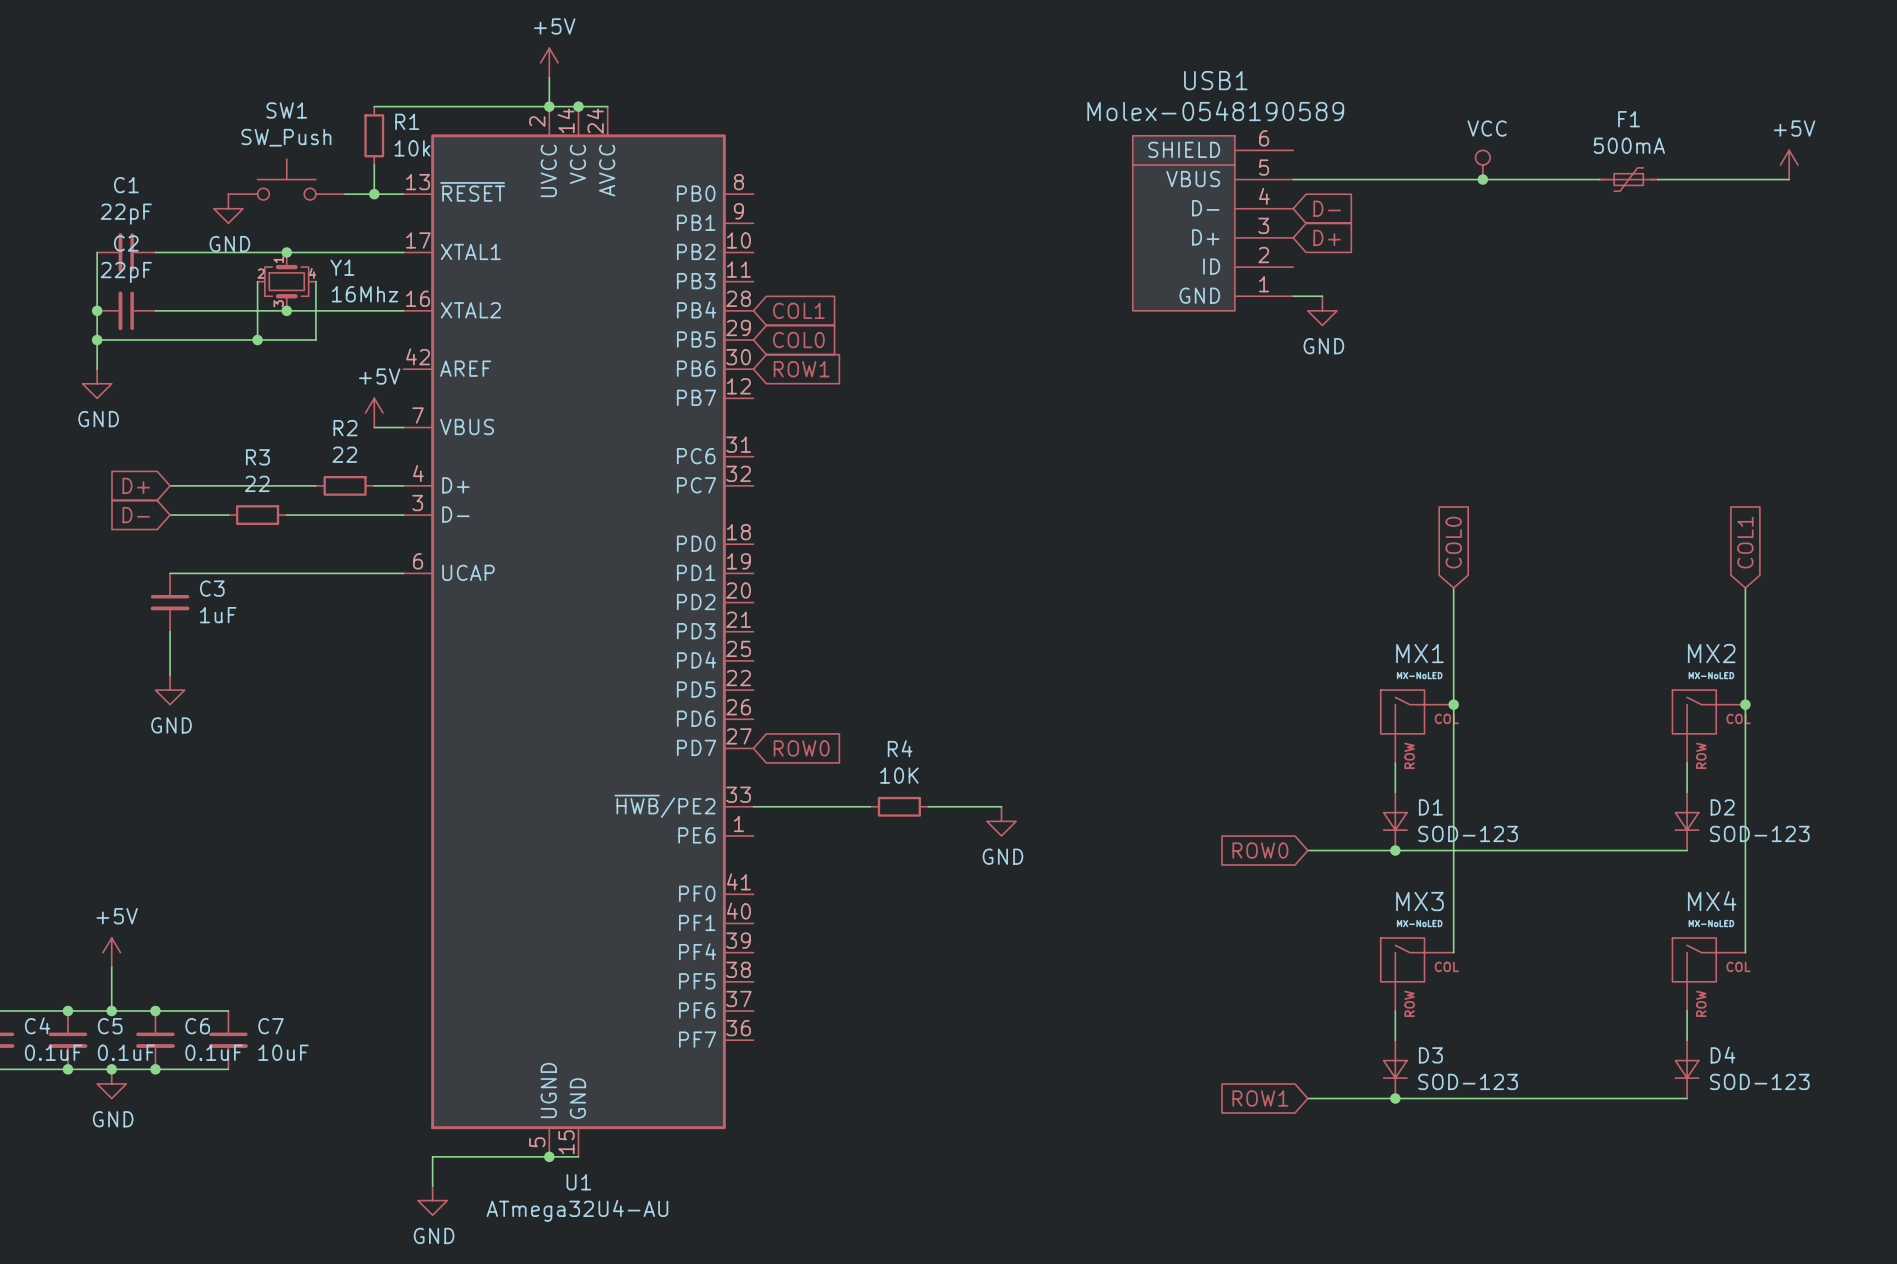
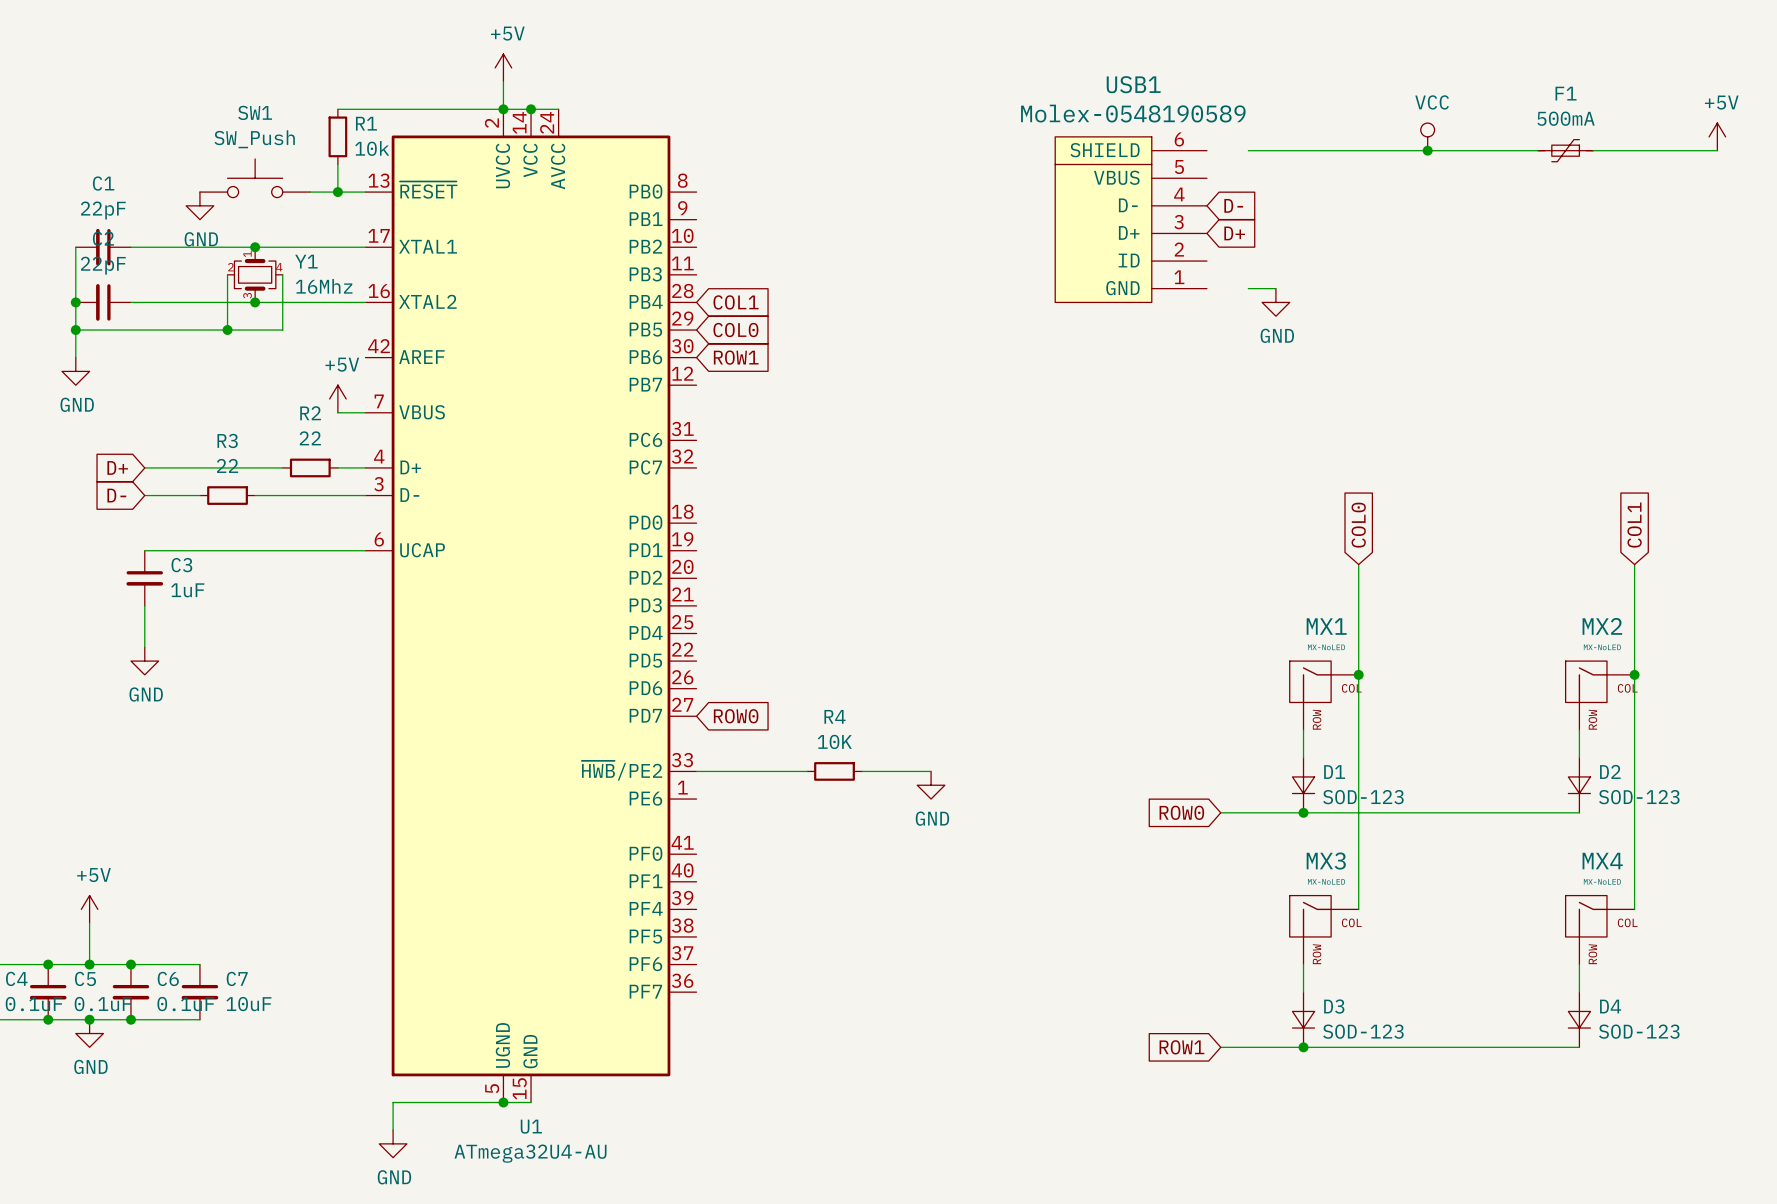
power symbol position: VCC (1482, 164) -> VCC (1427, 136)
power symbol position: +5V (1789, 164) -> +5V (1717, 136)
wire: (1293, 179) (1599, 179) -> (1248, 150) (1538, 150)
junction position: (1482, 179) -> (1427, 150)
F1 position: (1628, 179) -> (1565, 150)
wire: (1657, 179) (1789, 179) -> (1593, 150) (1717, 150)
wire: (1293, 296) (1322, 296) -> (1248, 288) (1275, 288)
power symbol position: GND (1322, 310) -> GND (1275, 302)

